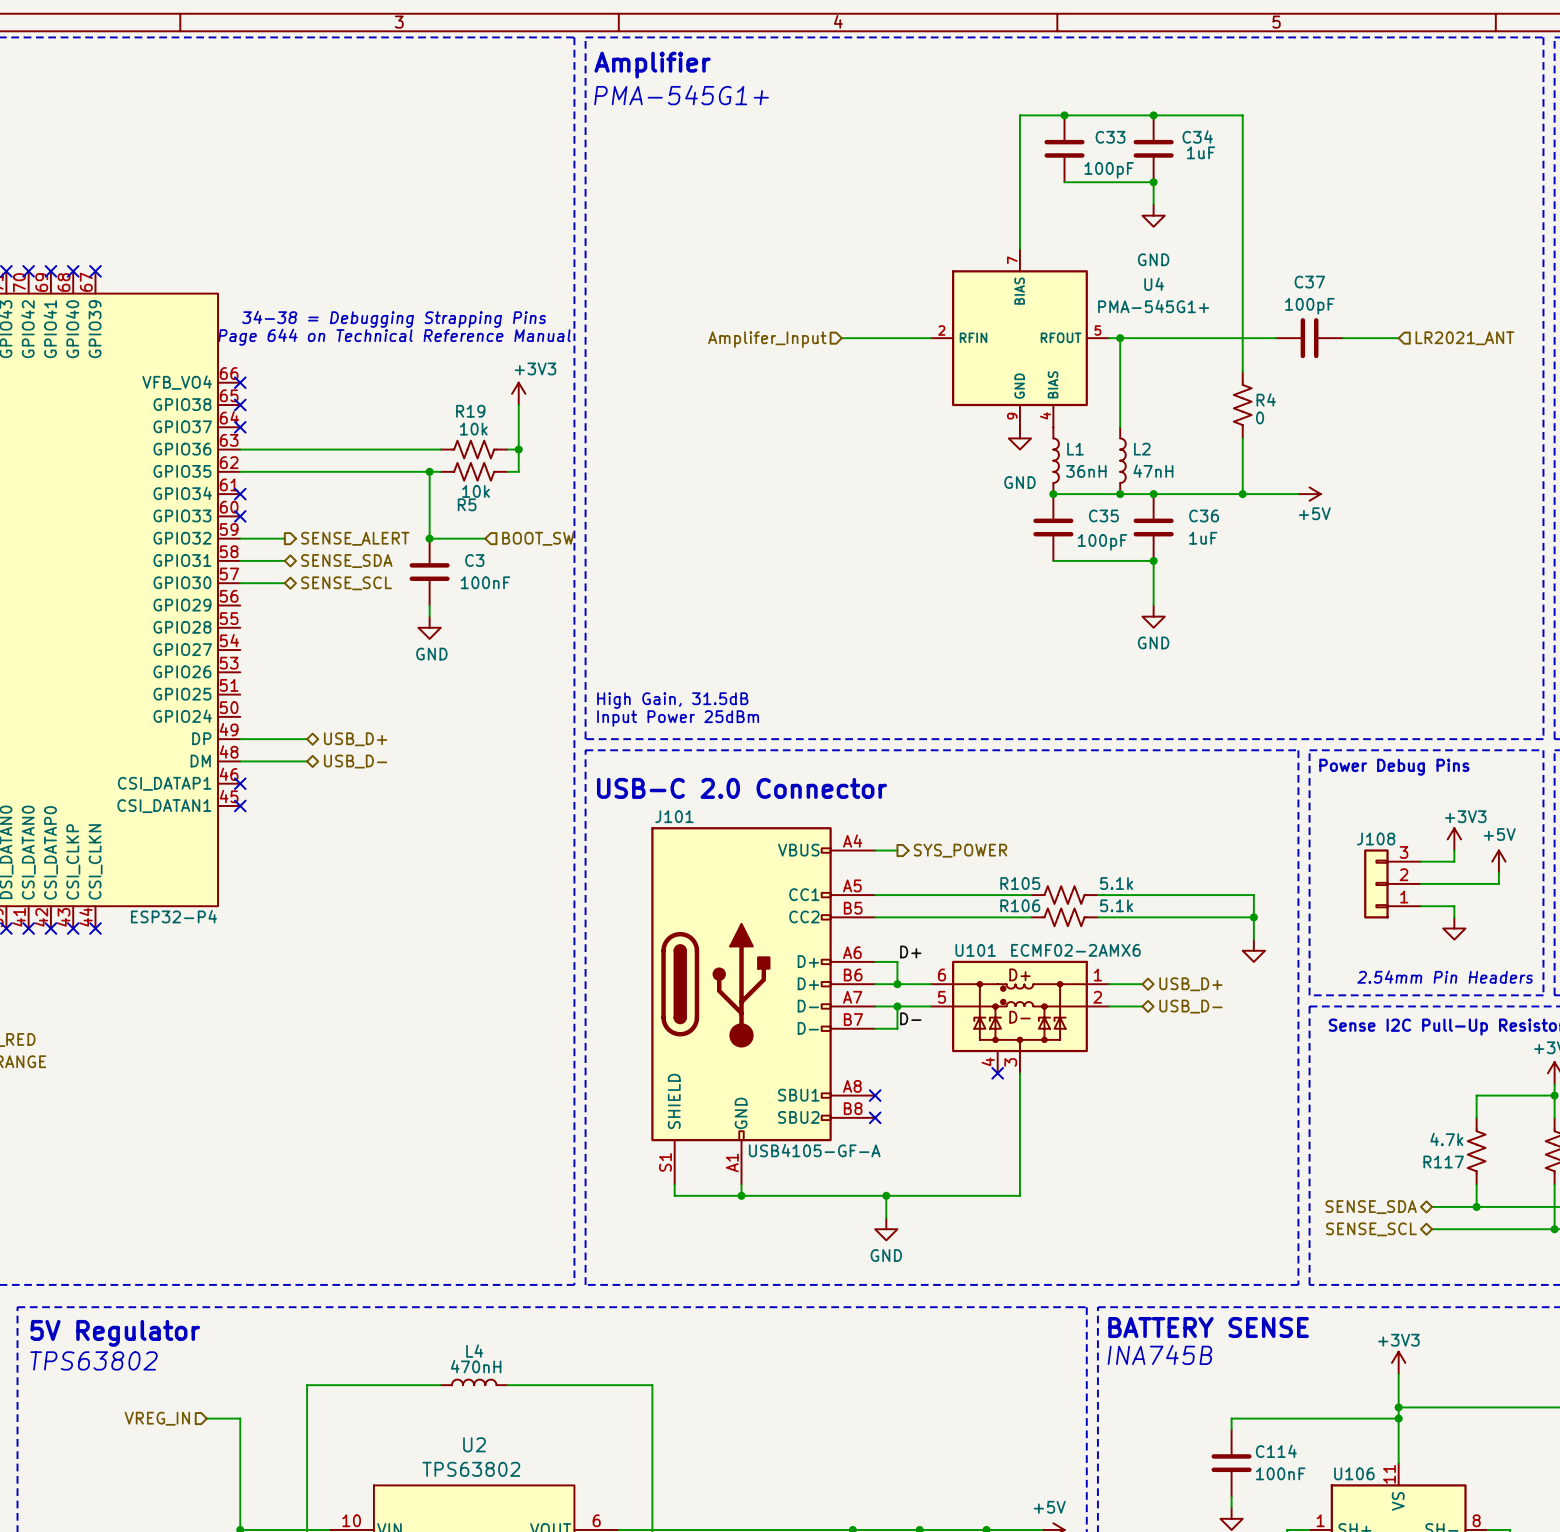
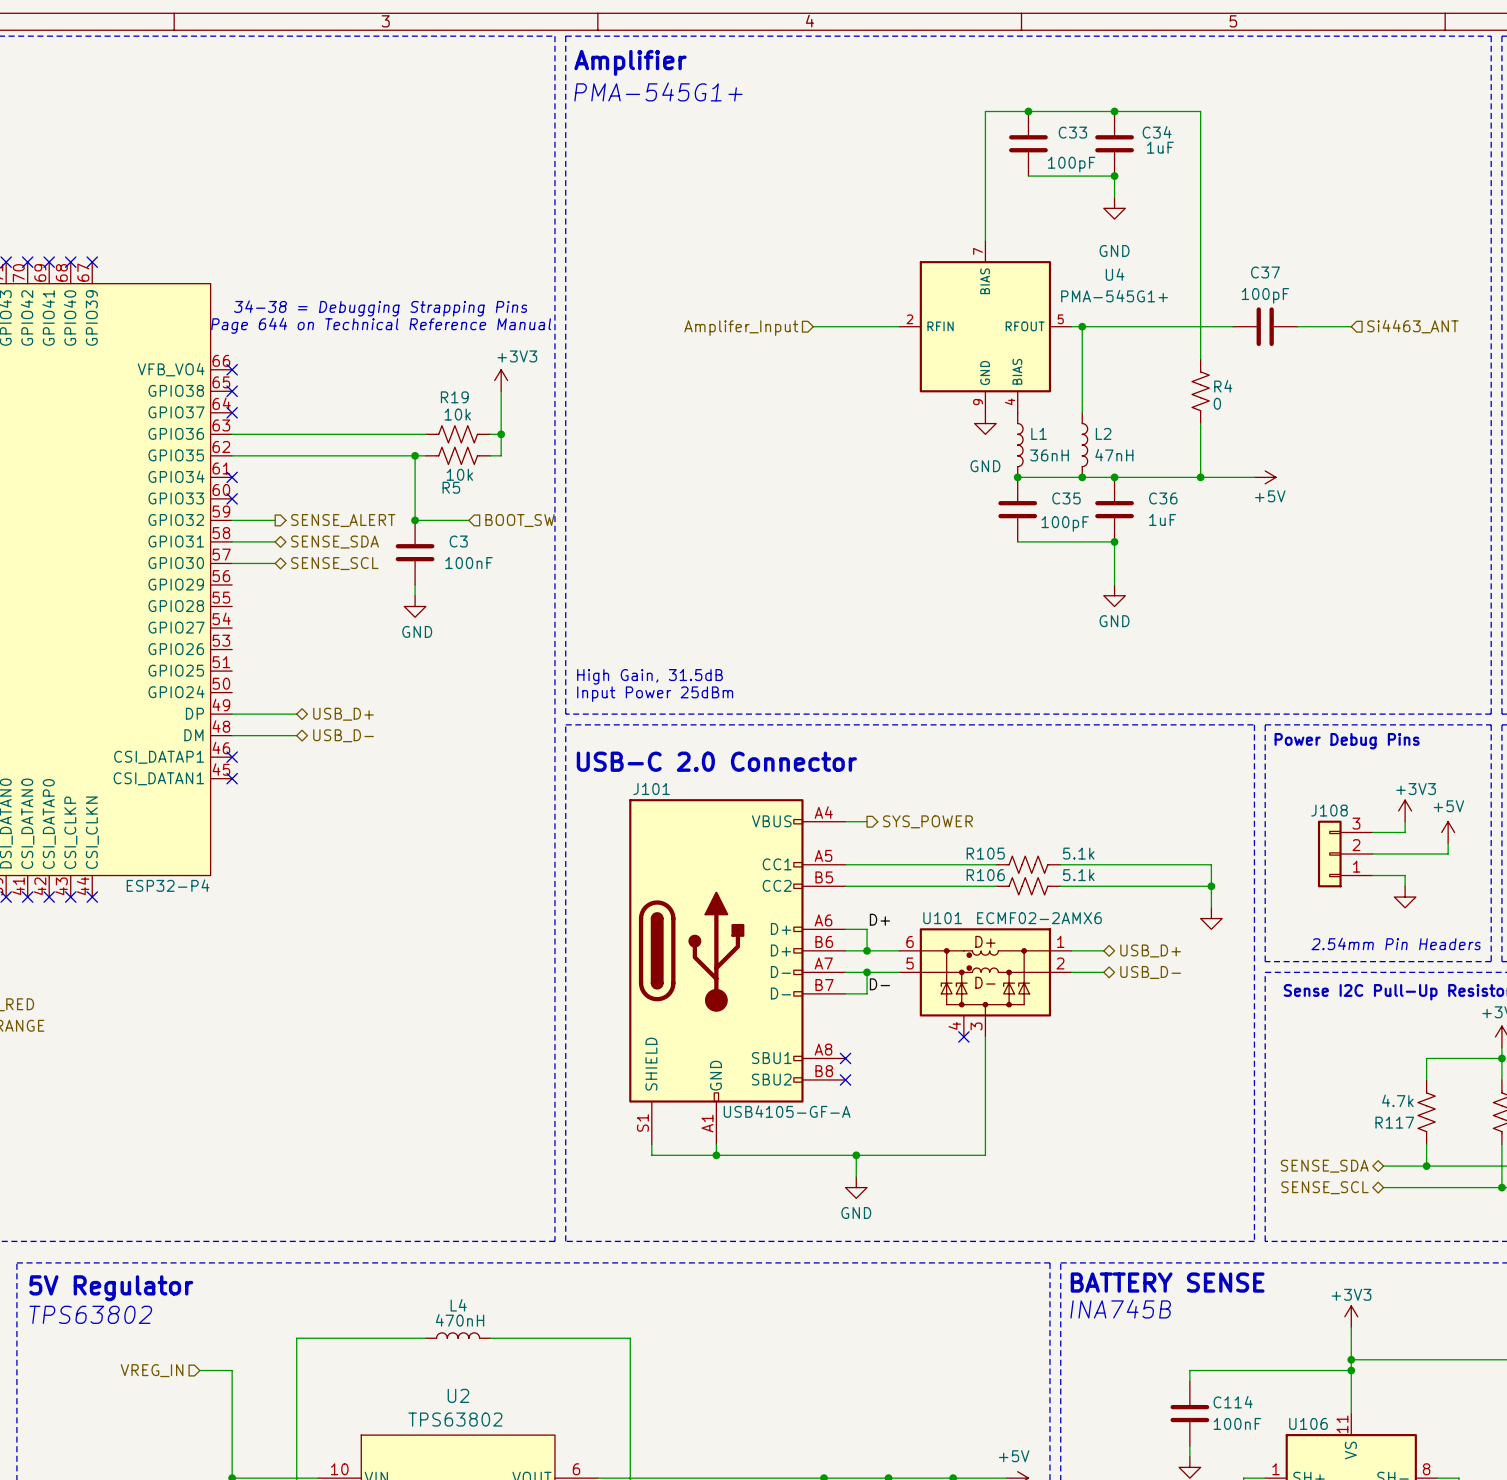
hierarchical label: LR2021_ANT (1464, 338) -> Si4463_ANT (1412, 326)

